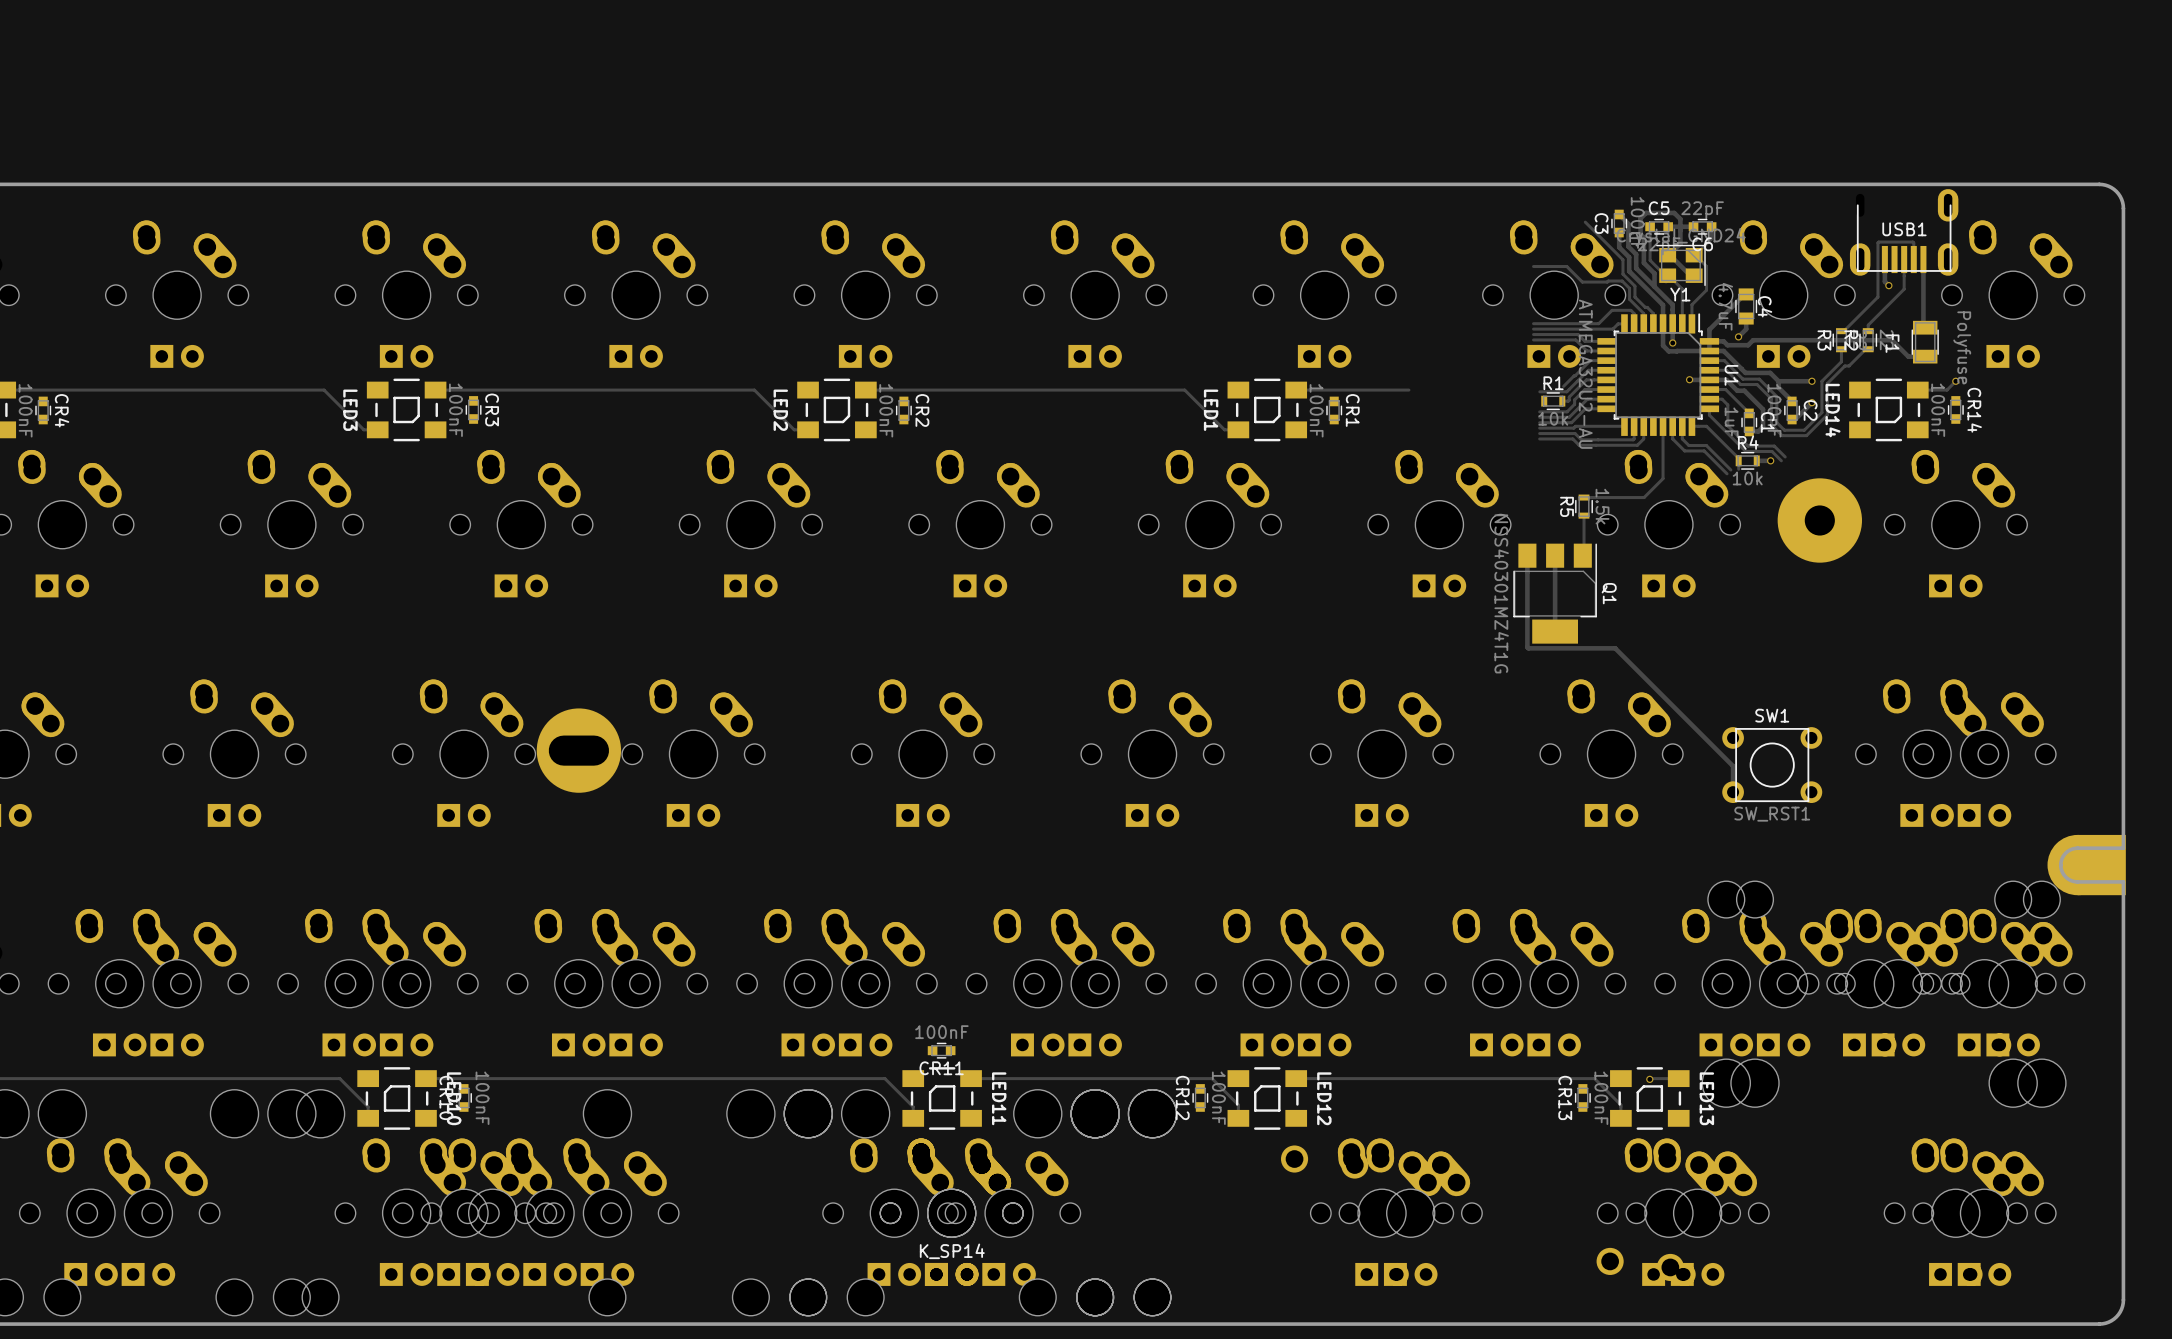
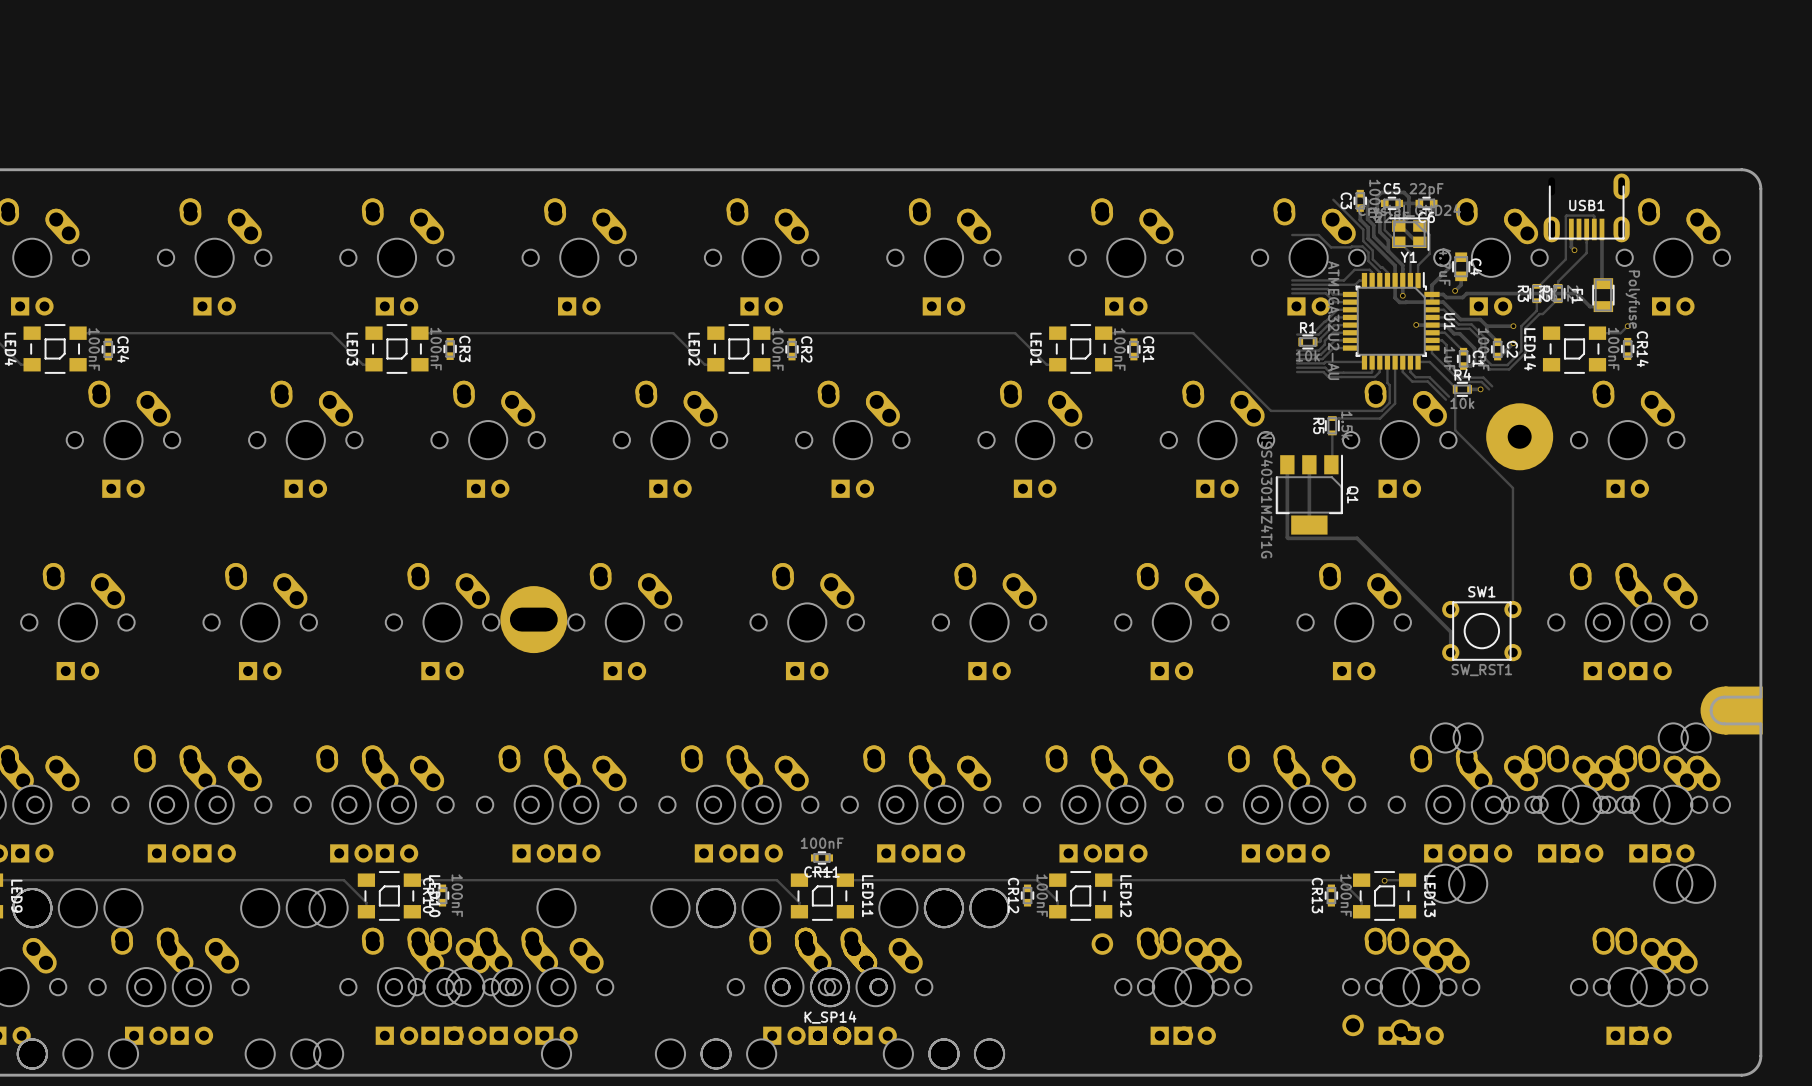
track: none -> (1193, 333) (1270, 410) (1381, 410) (1389, 402) (1387, 361)
track: none -> (1455, 396) (1455, 430) (1512, 488) (1512, 609)

